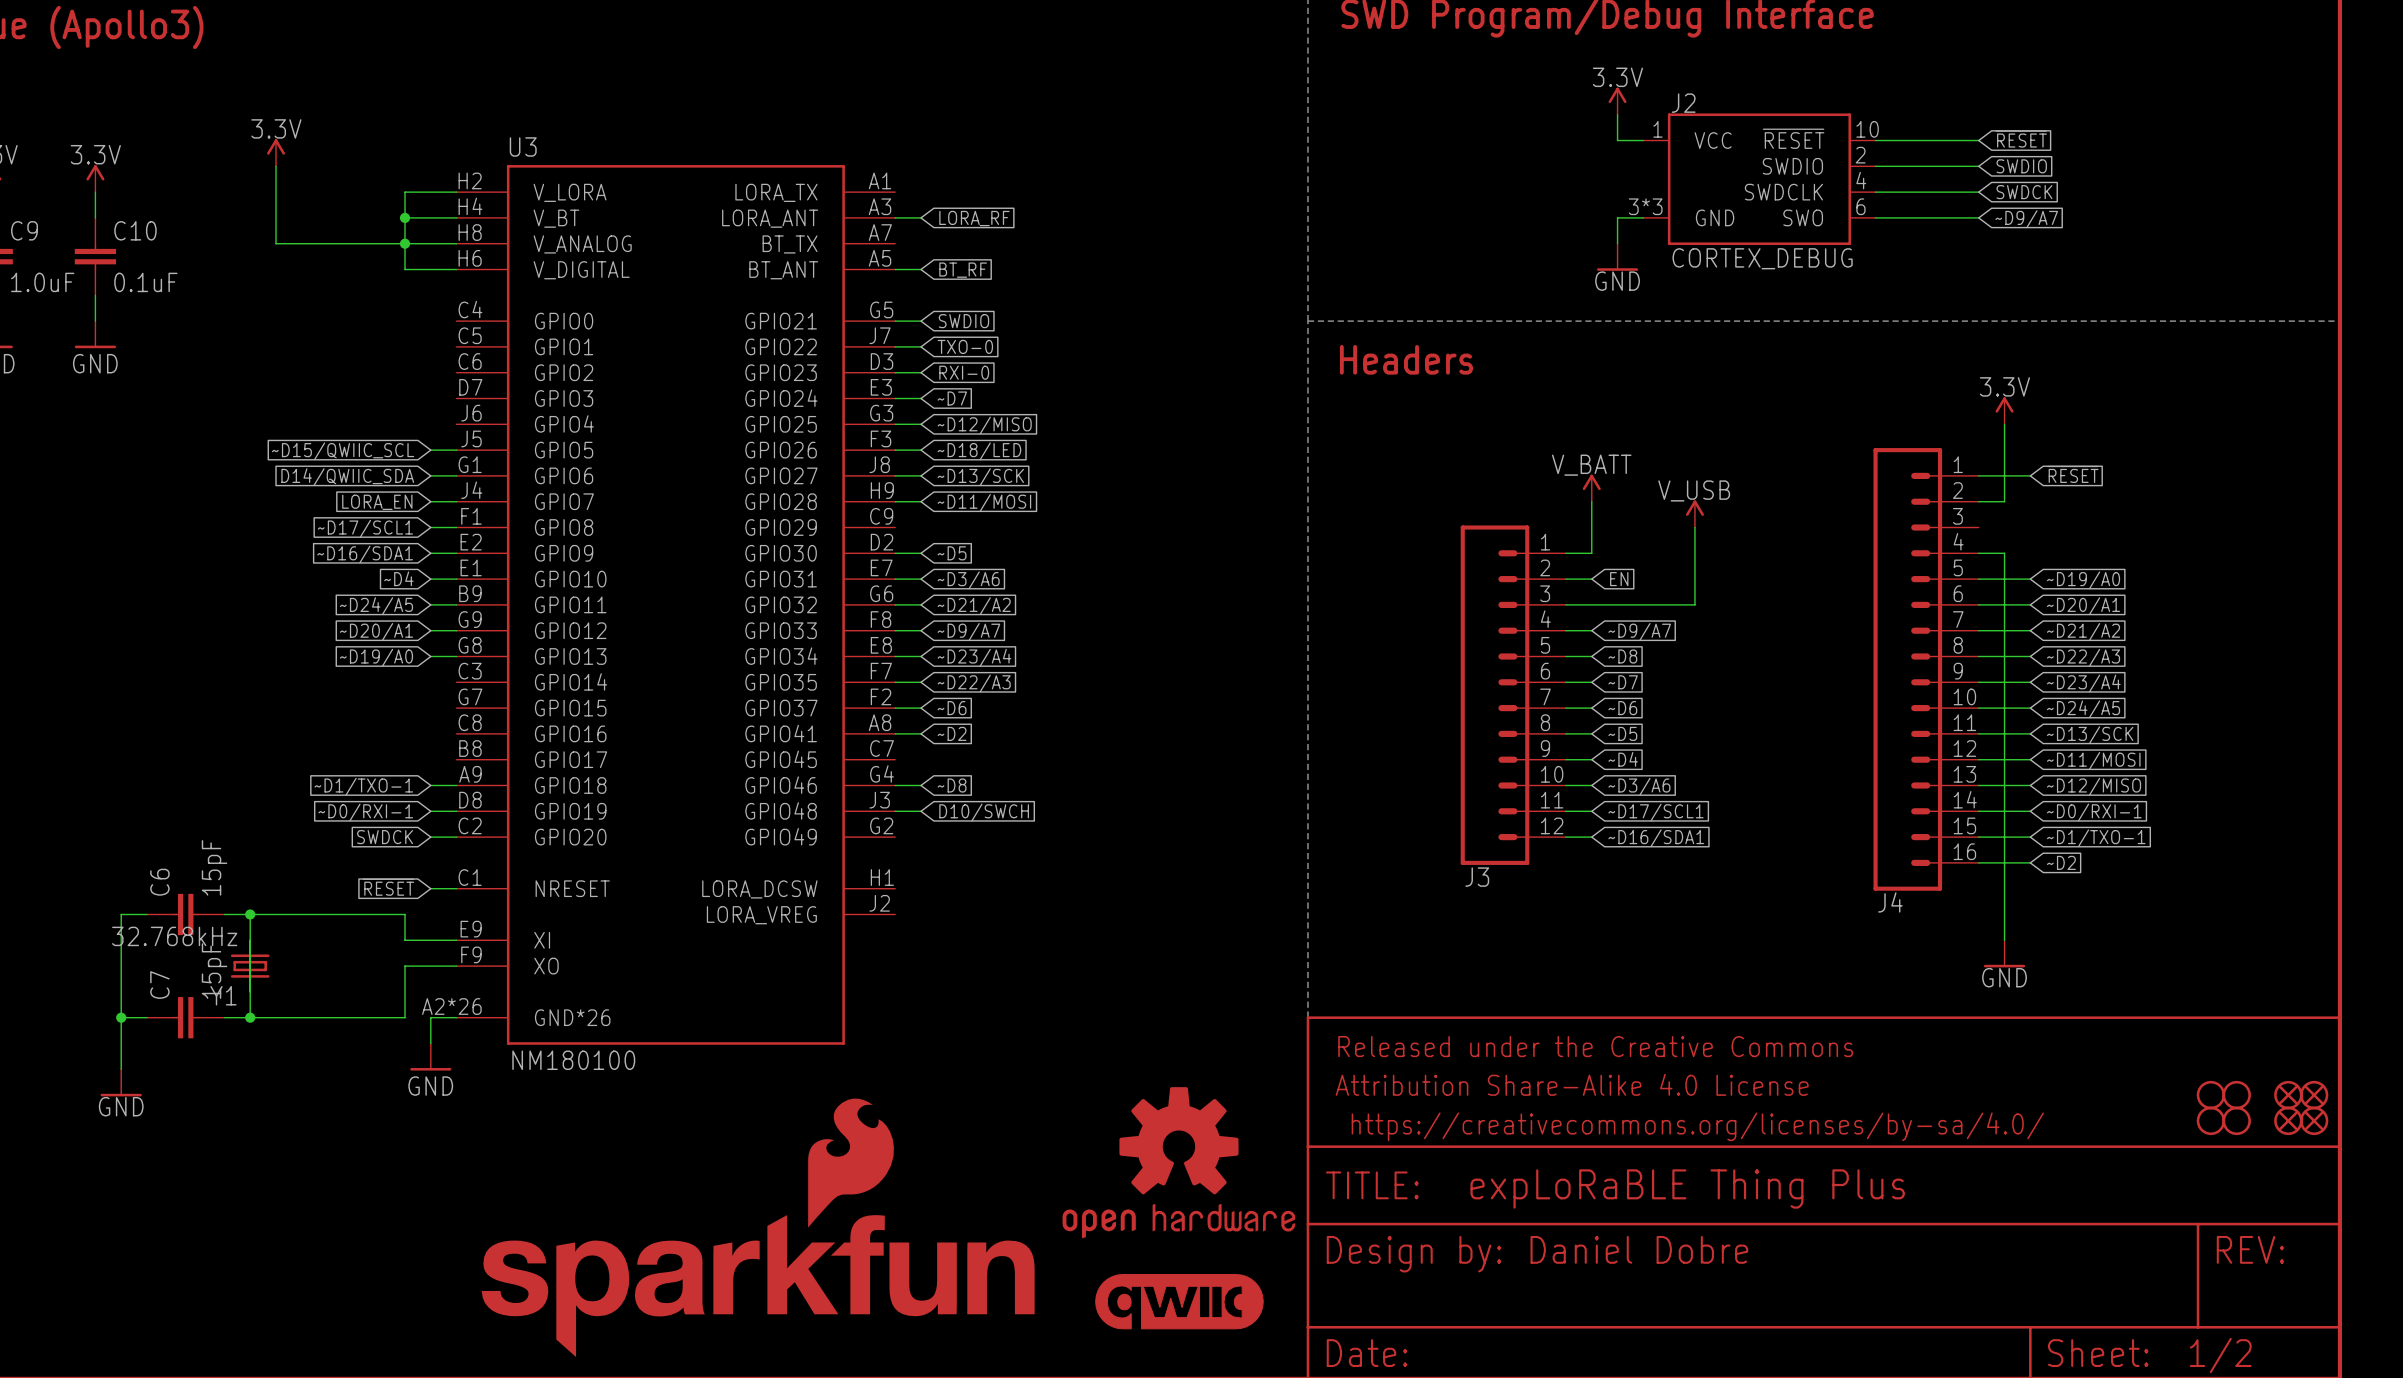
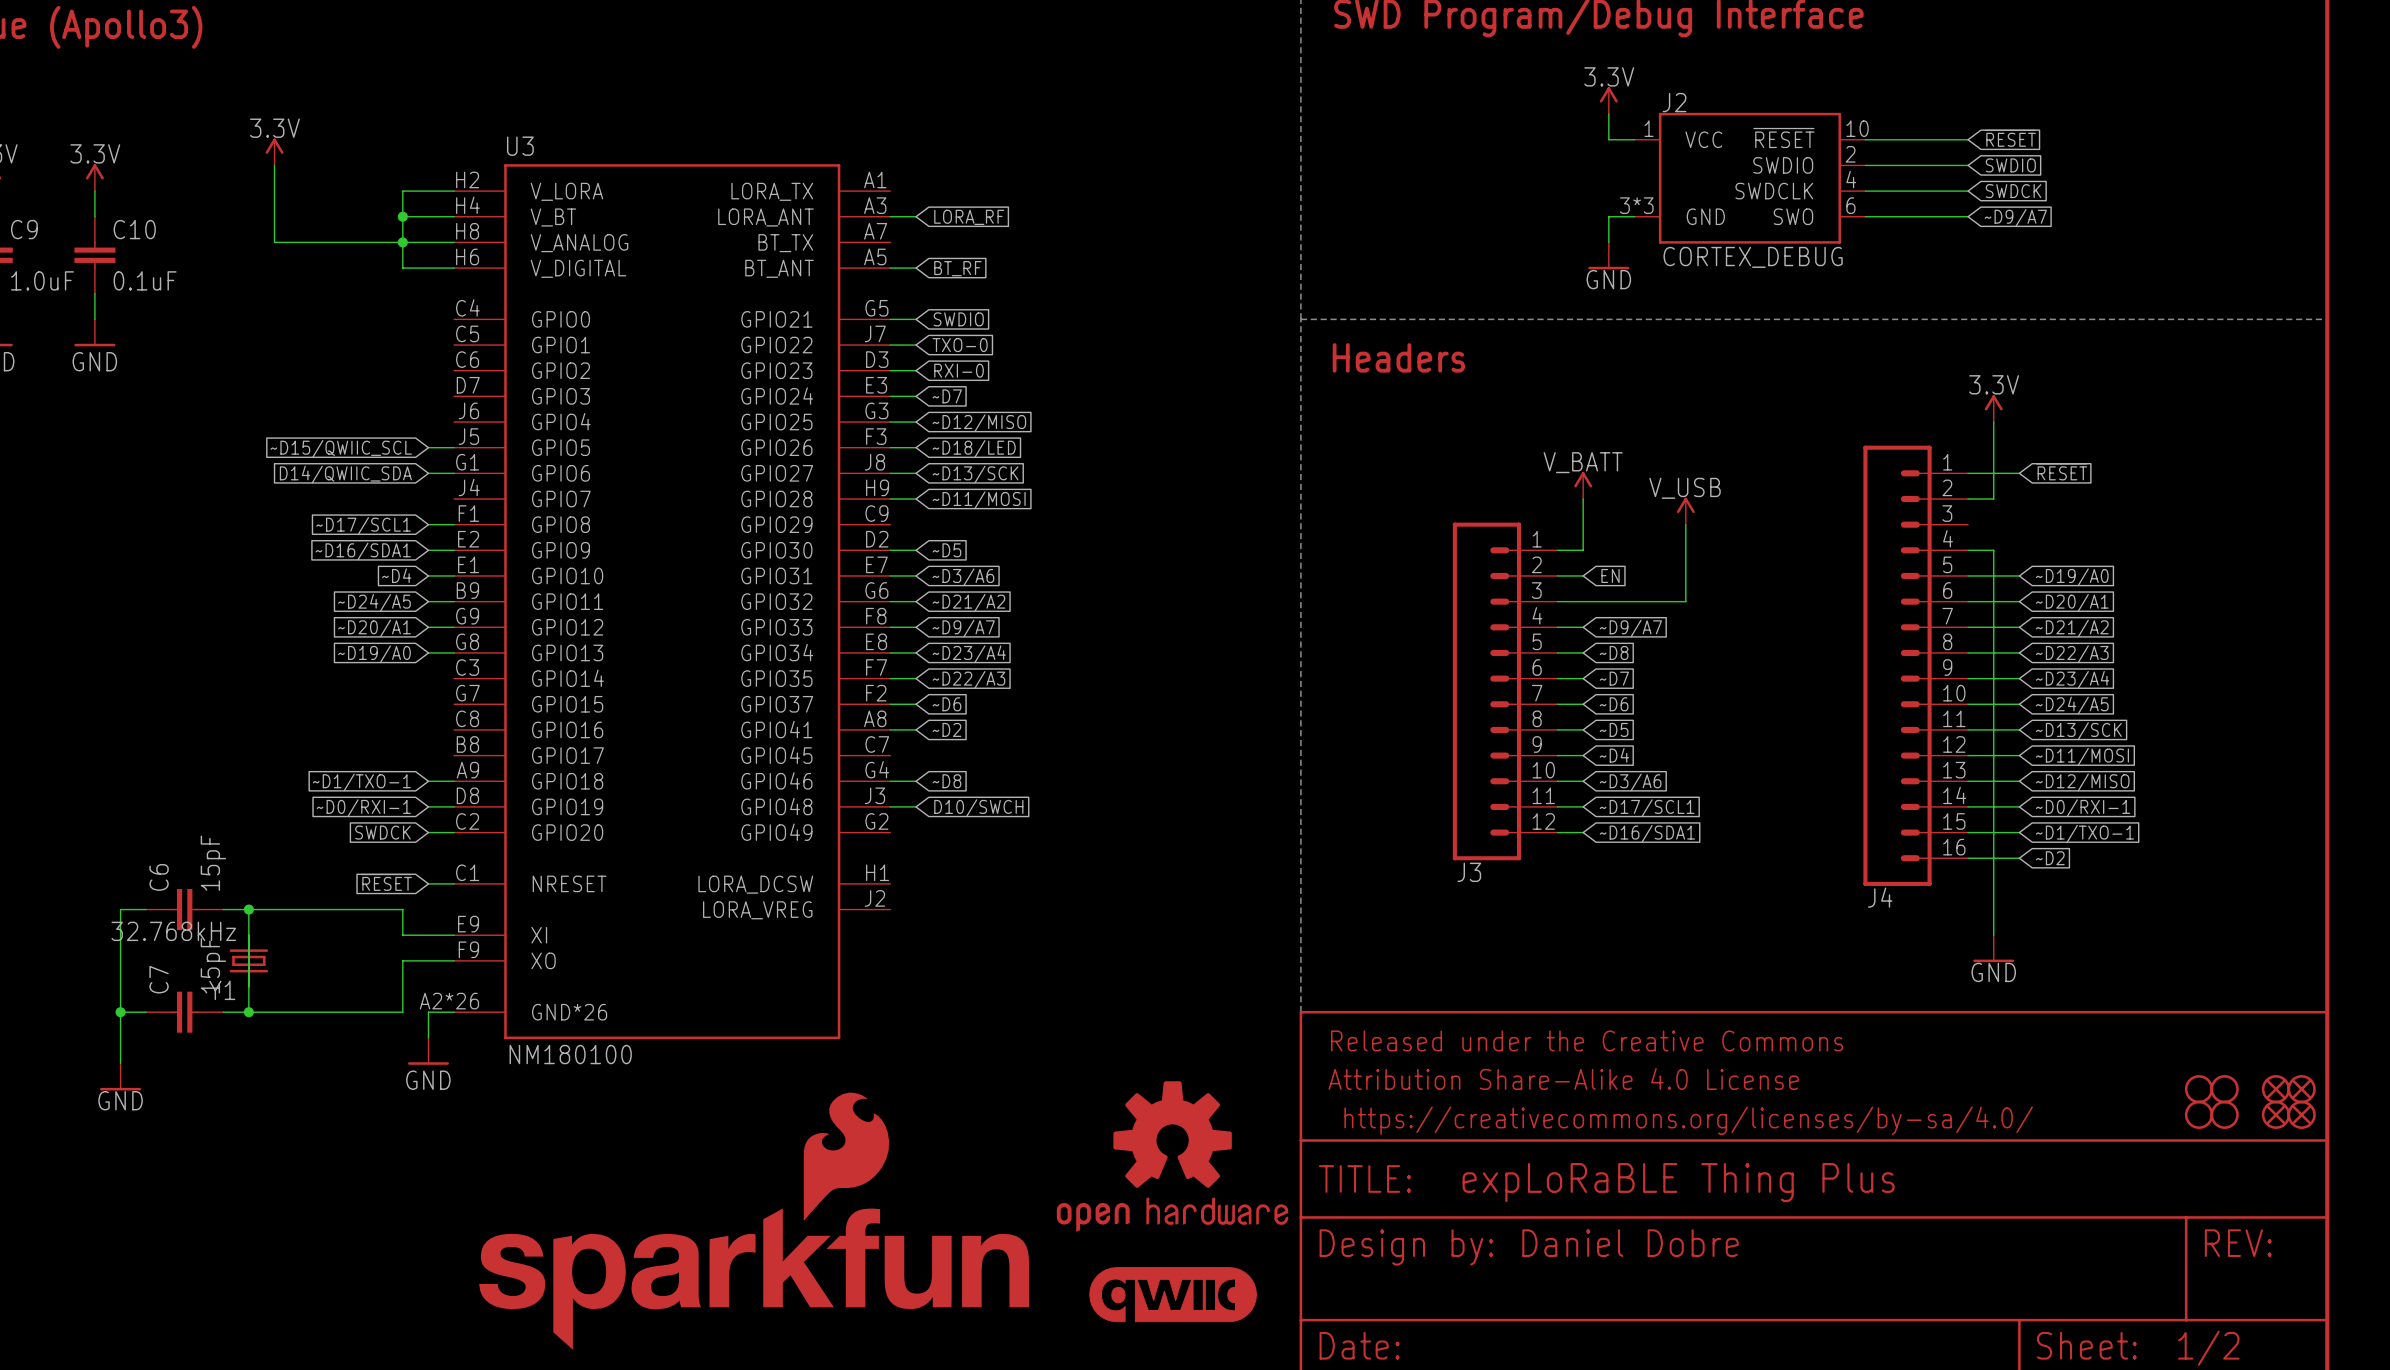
wire: (430, 501) (456, 501) -> none
global label: LORA_EN (377, 502) -> none

